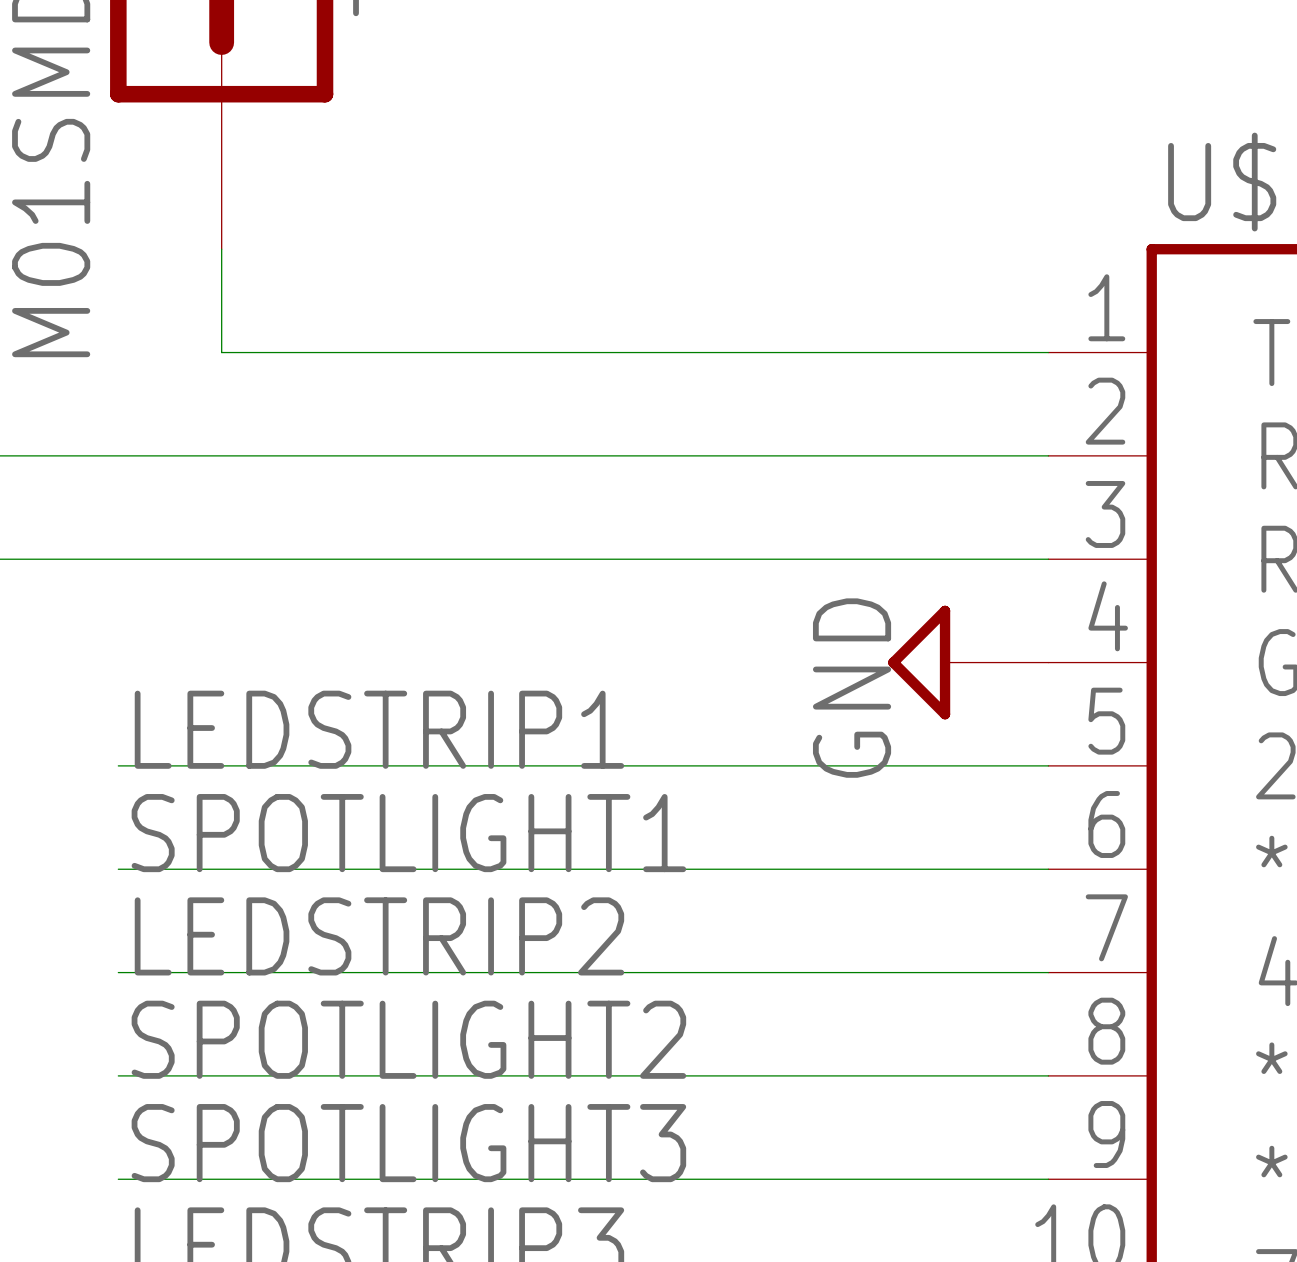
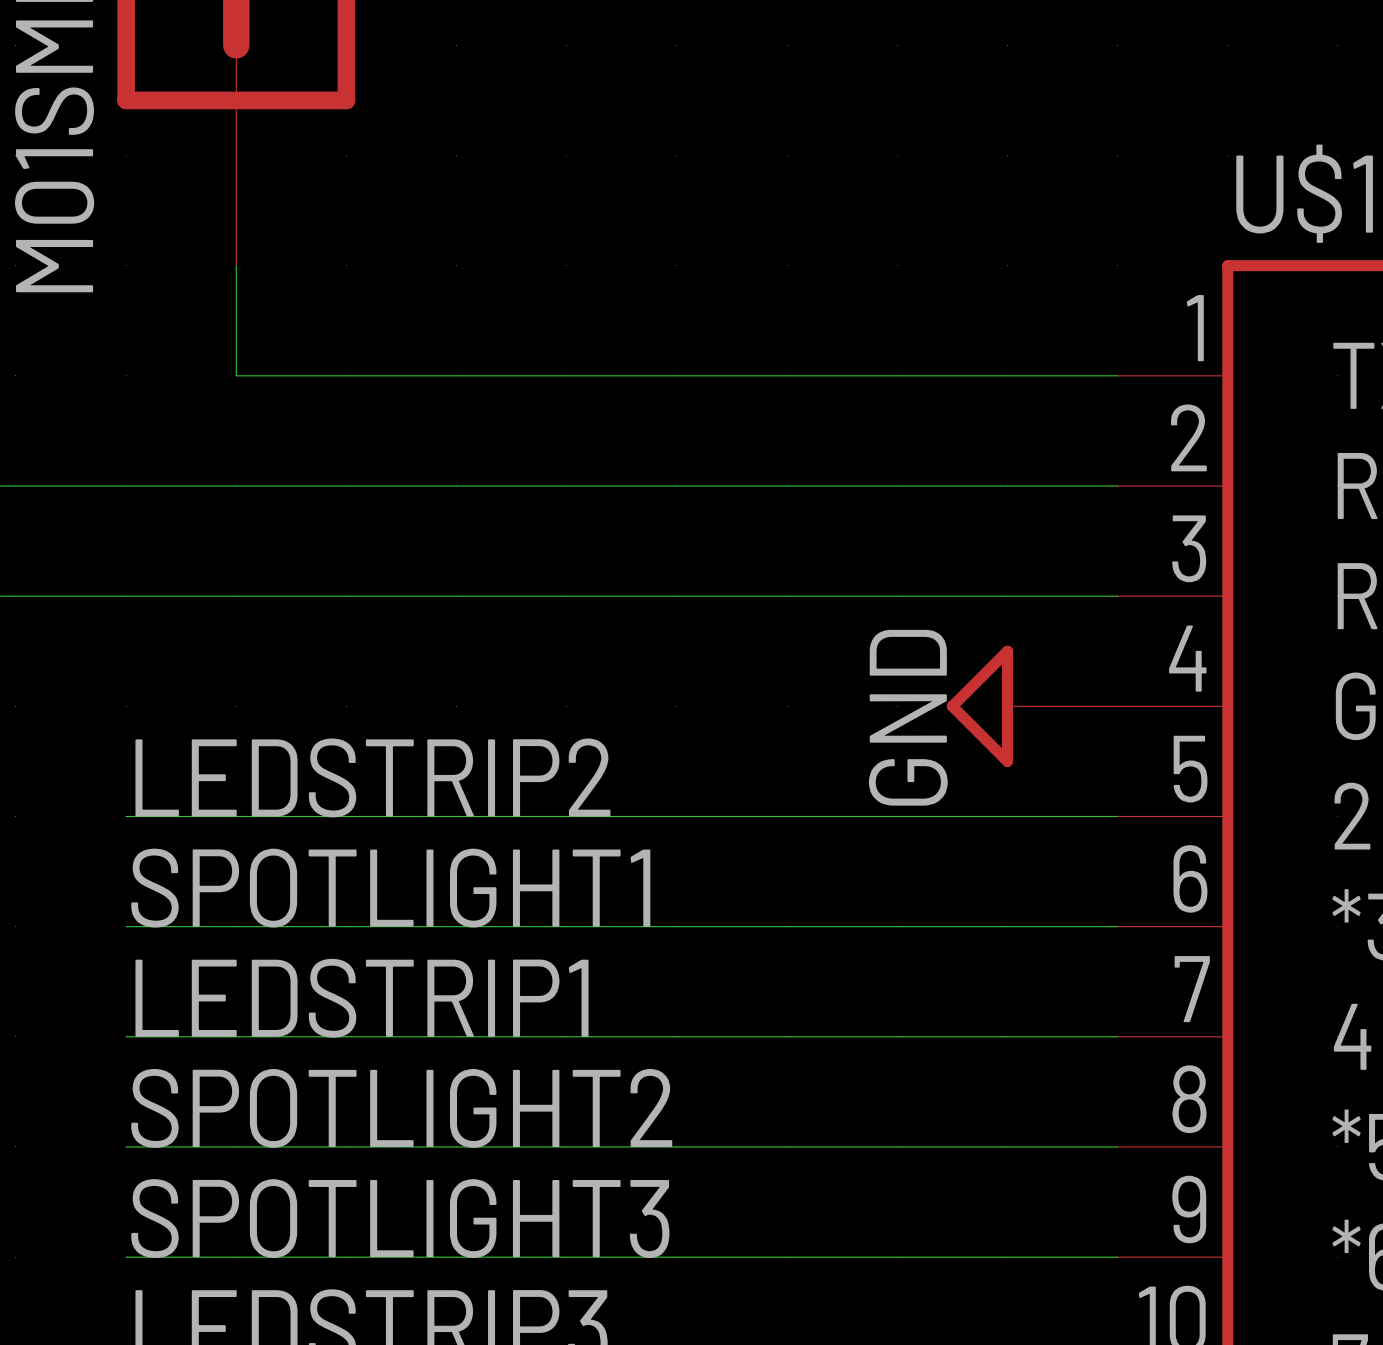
label: LEDSTRIP1 (379, 729) -> LEDSTRIP2 (372, 777)
label: LEDSTRIP2 (379, 936) -> LEDSTRIP1 (362, 998)

